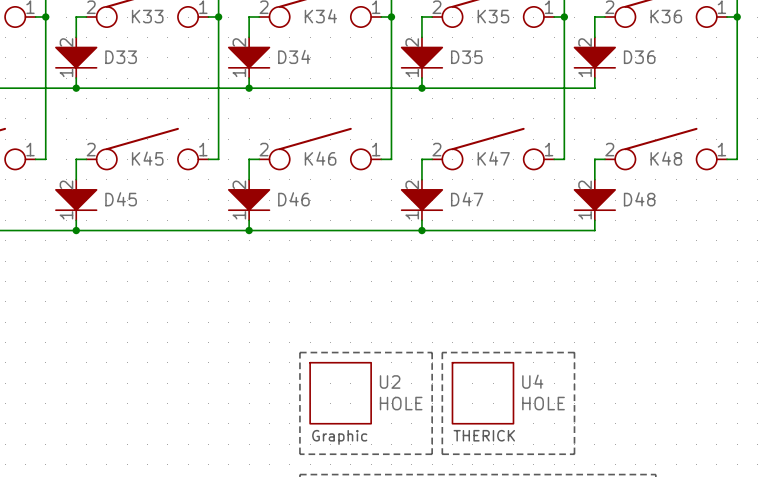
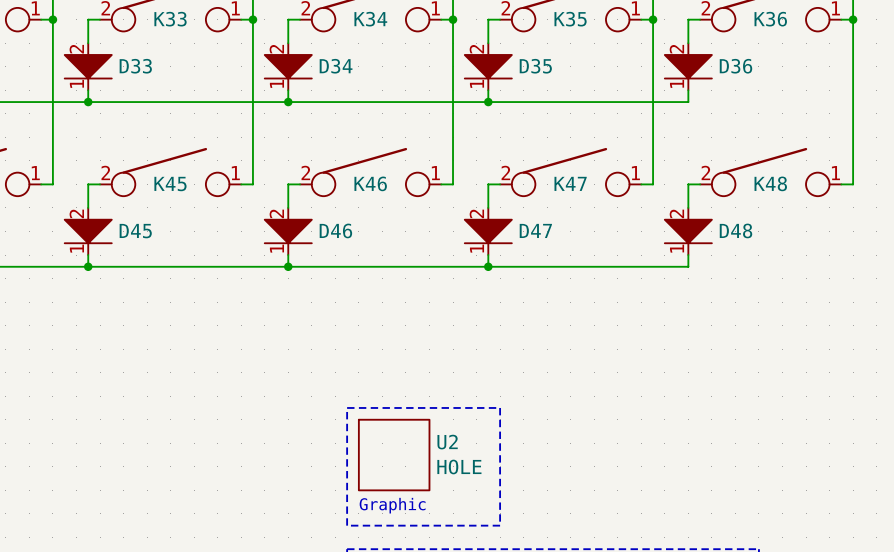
line: (442, 352) (442, 454) (574, 454) (574, 352) (442, 352) -> none
U4: HOLE (482, 393) -> none
text: THERICK (484, 435) -> none

